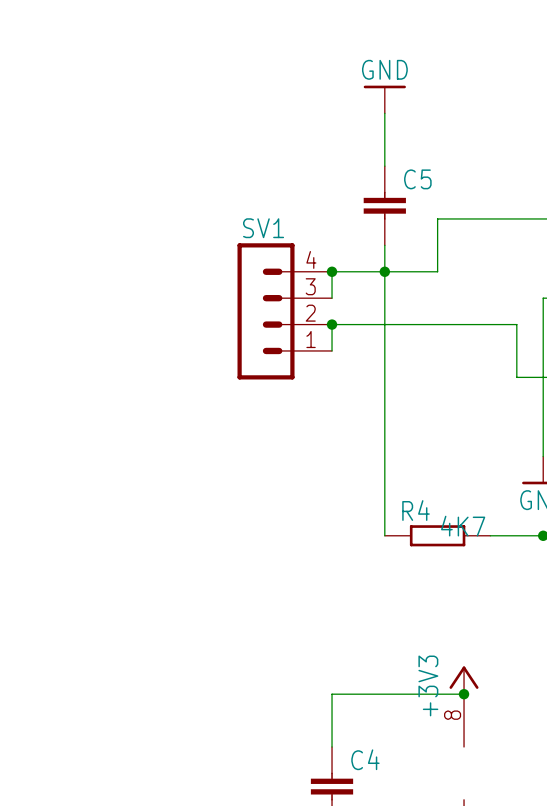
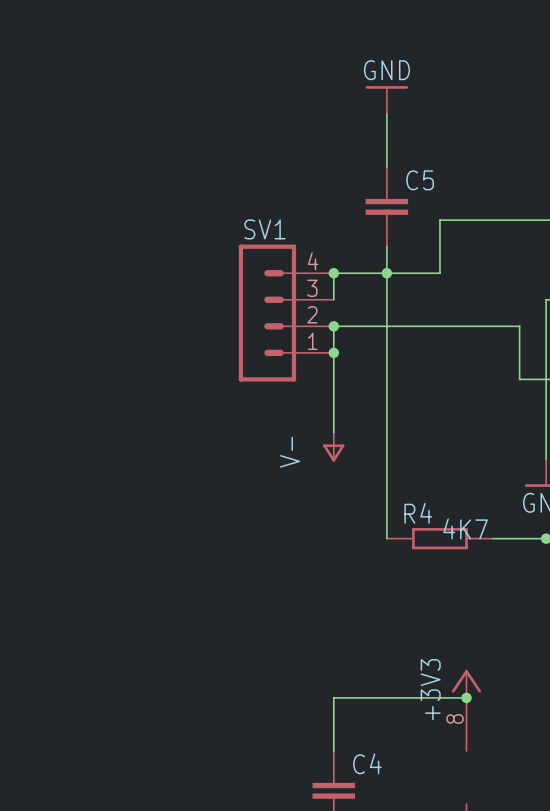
wire: none -> (333, 352) (333, 432)
junction: none -> (333, 352)
power symbol: none -> V- (333, 447)

